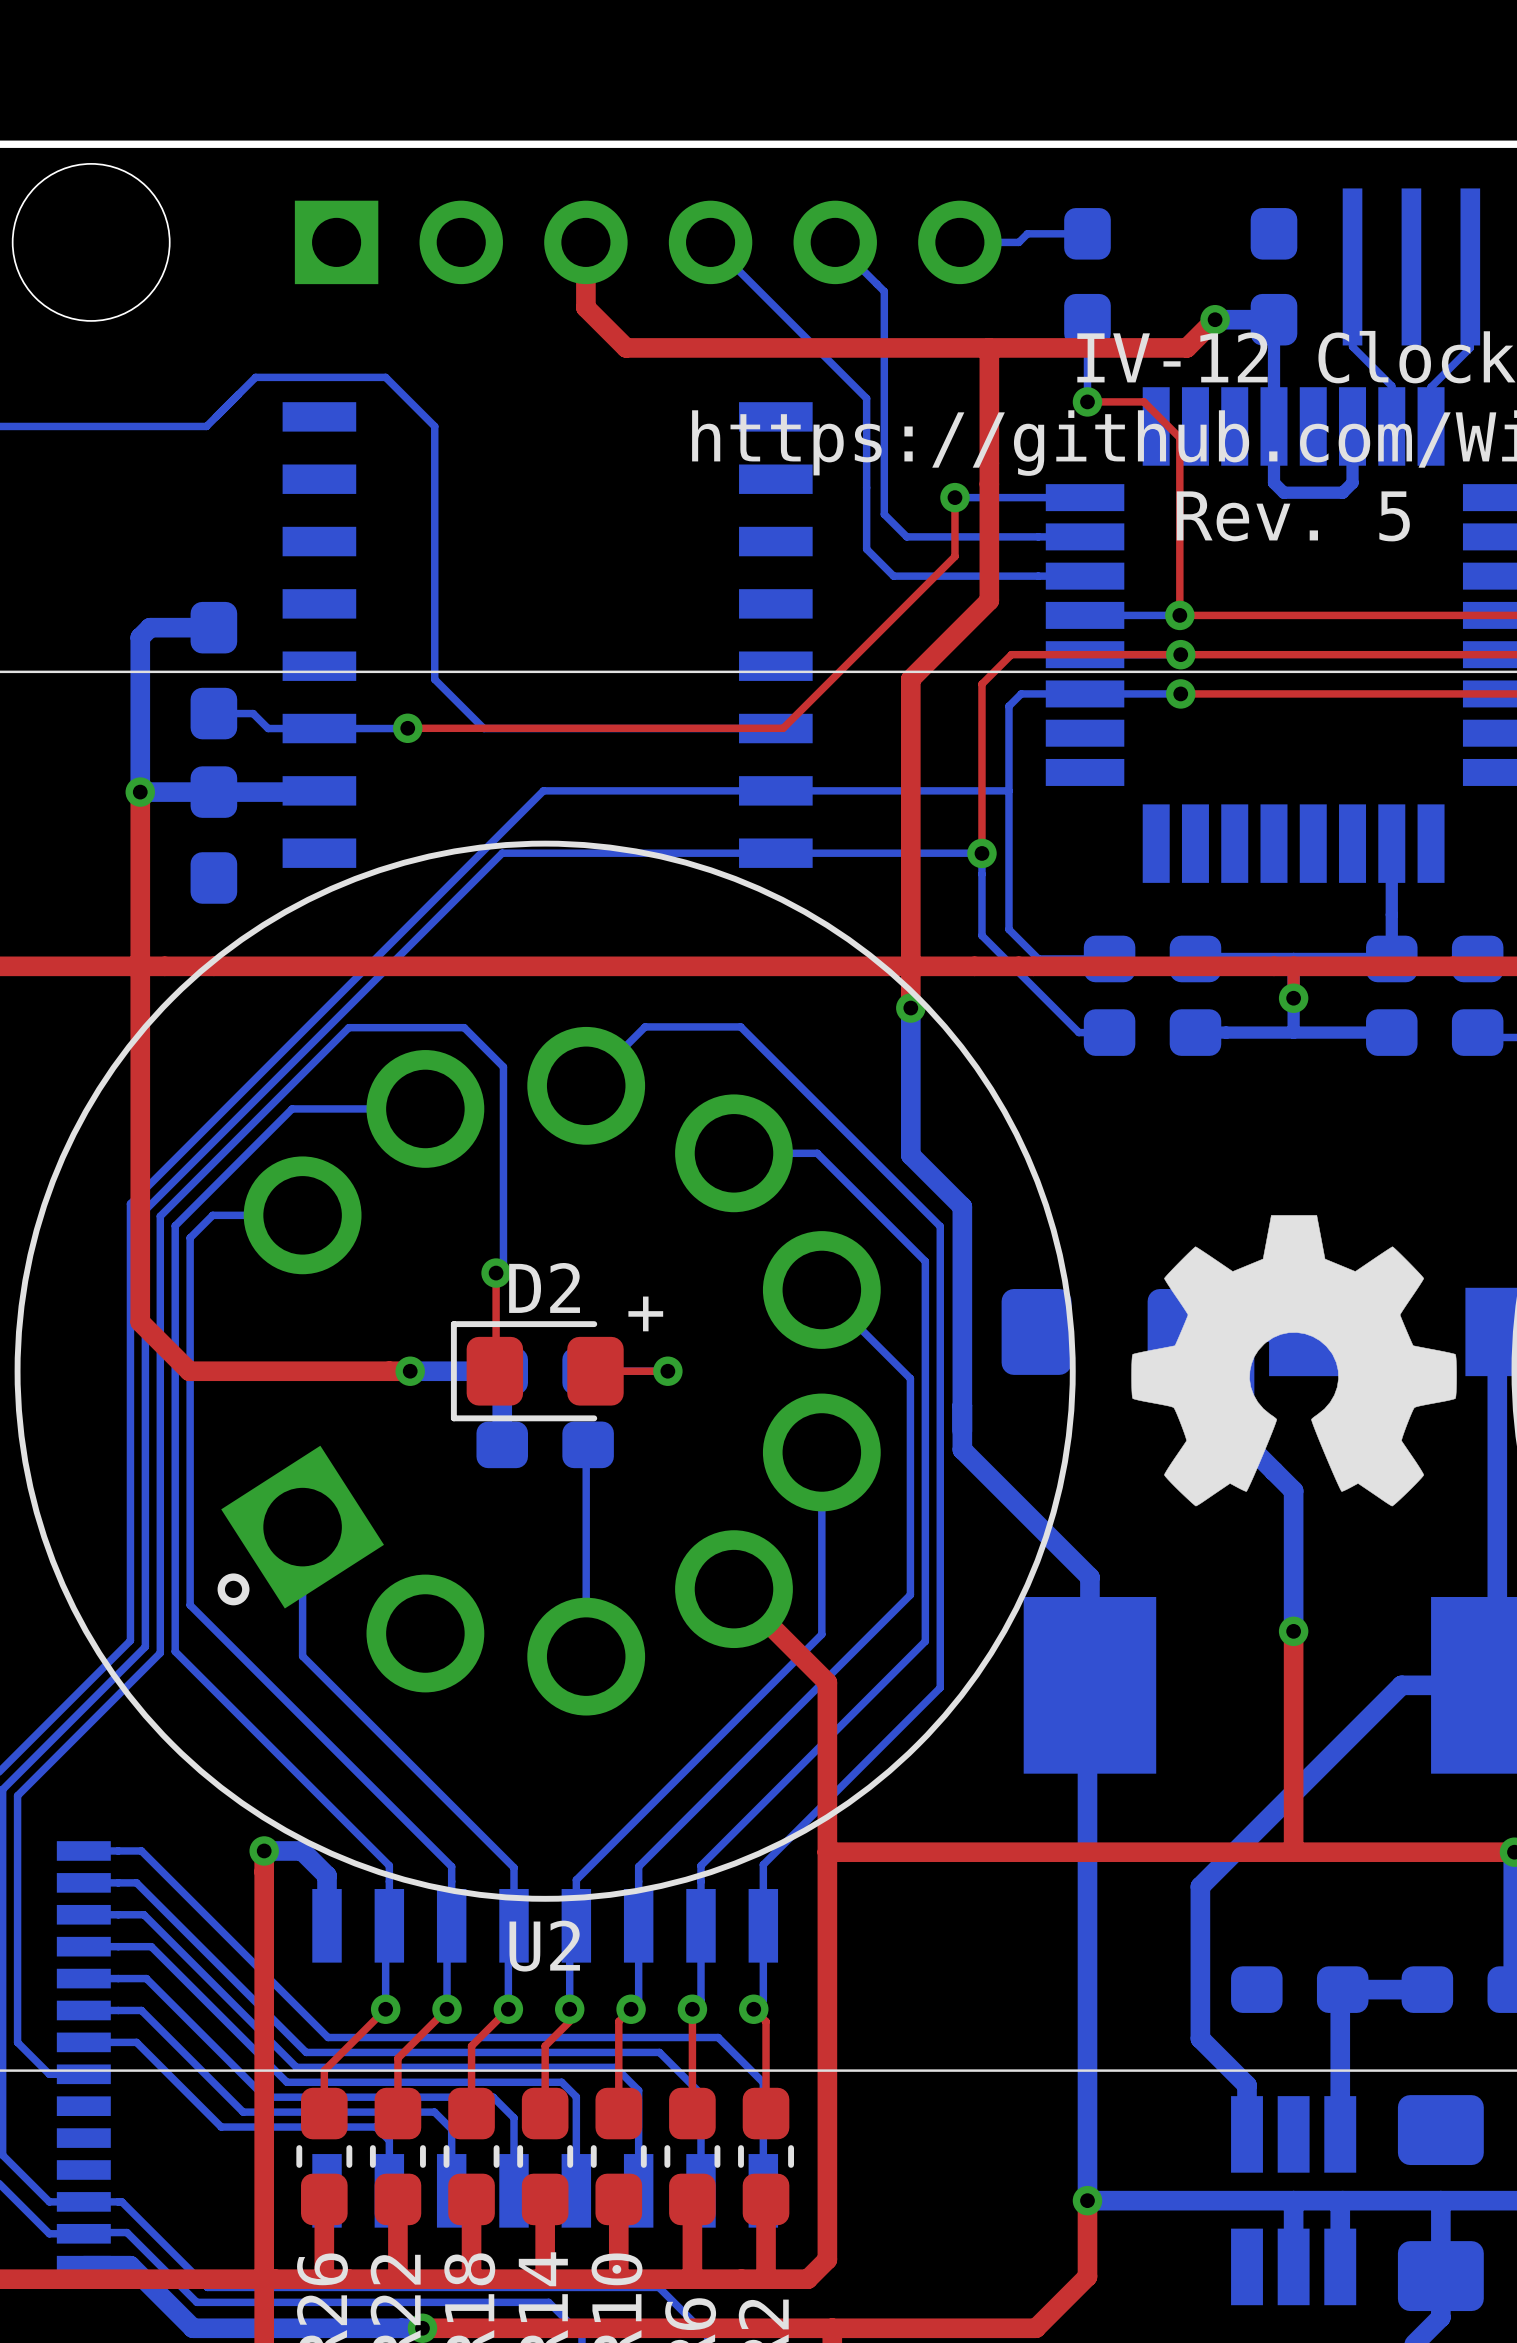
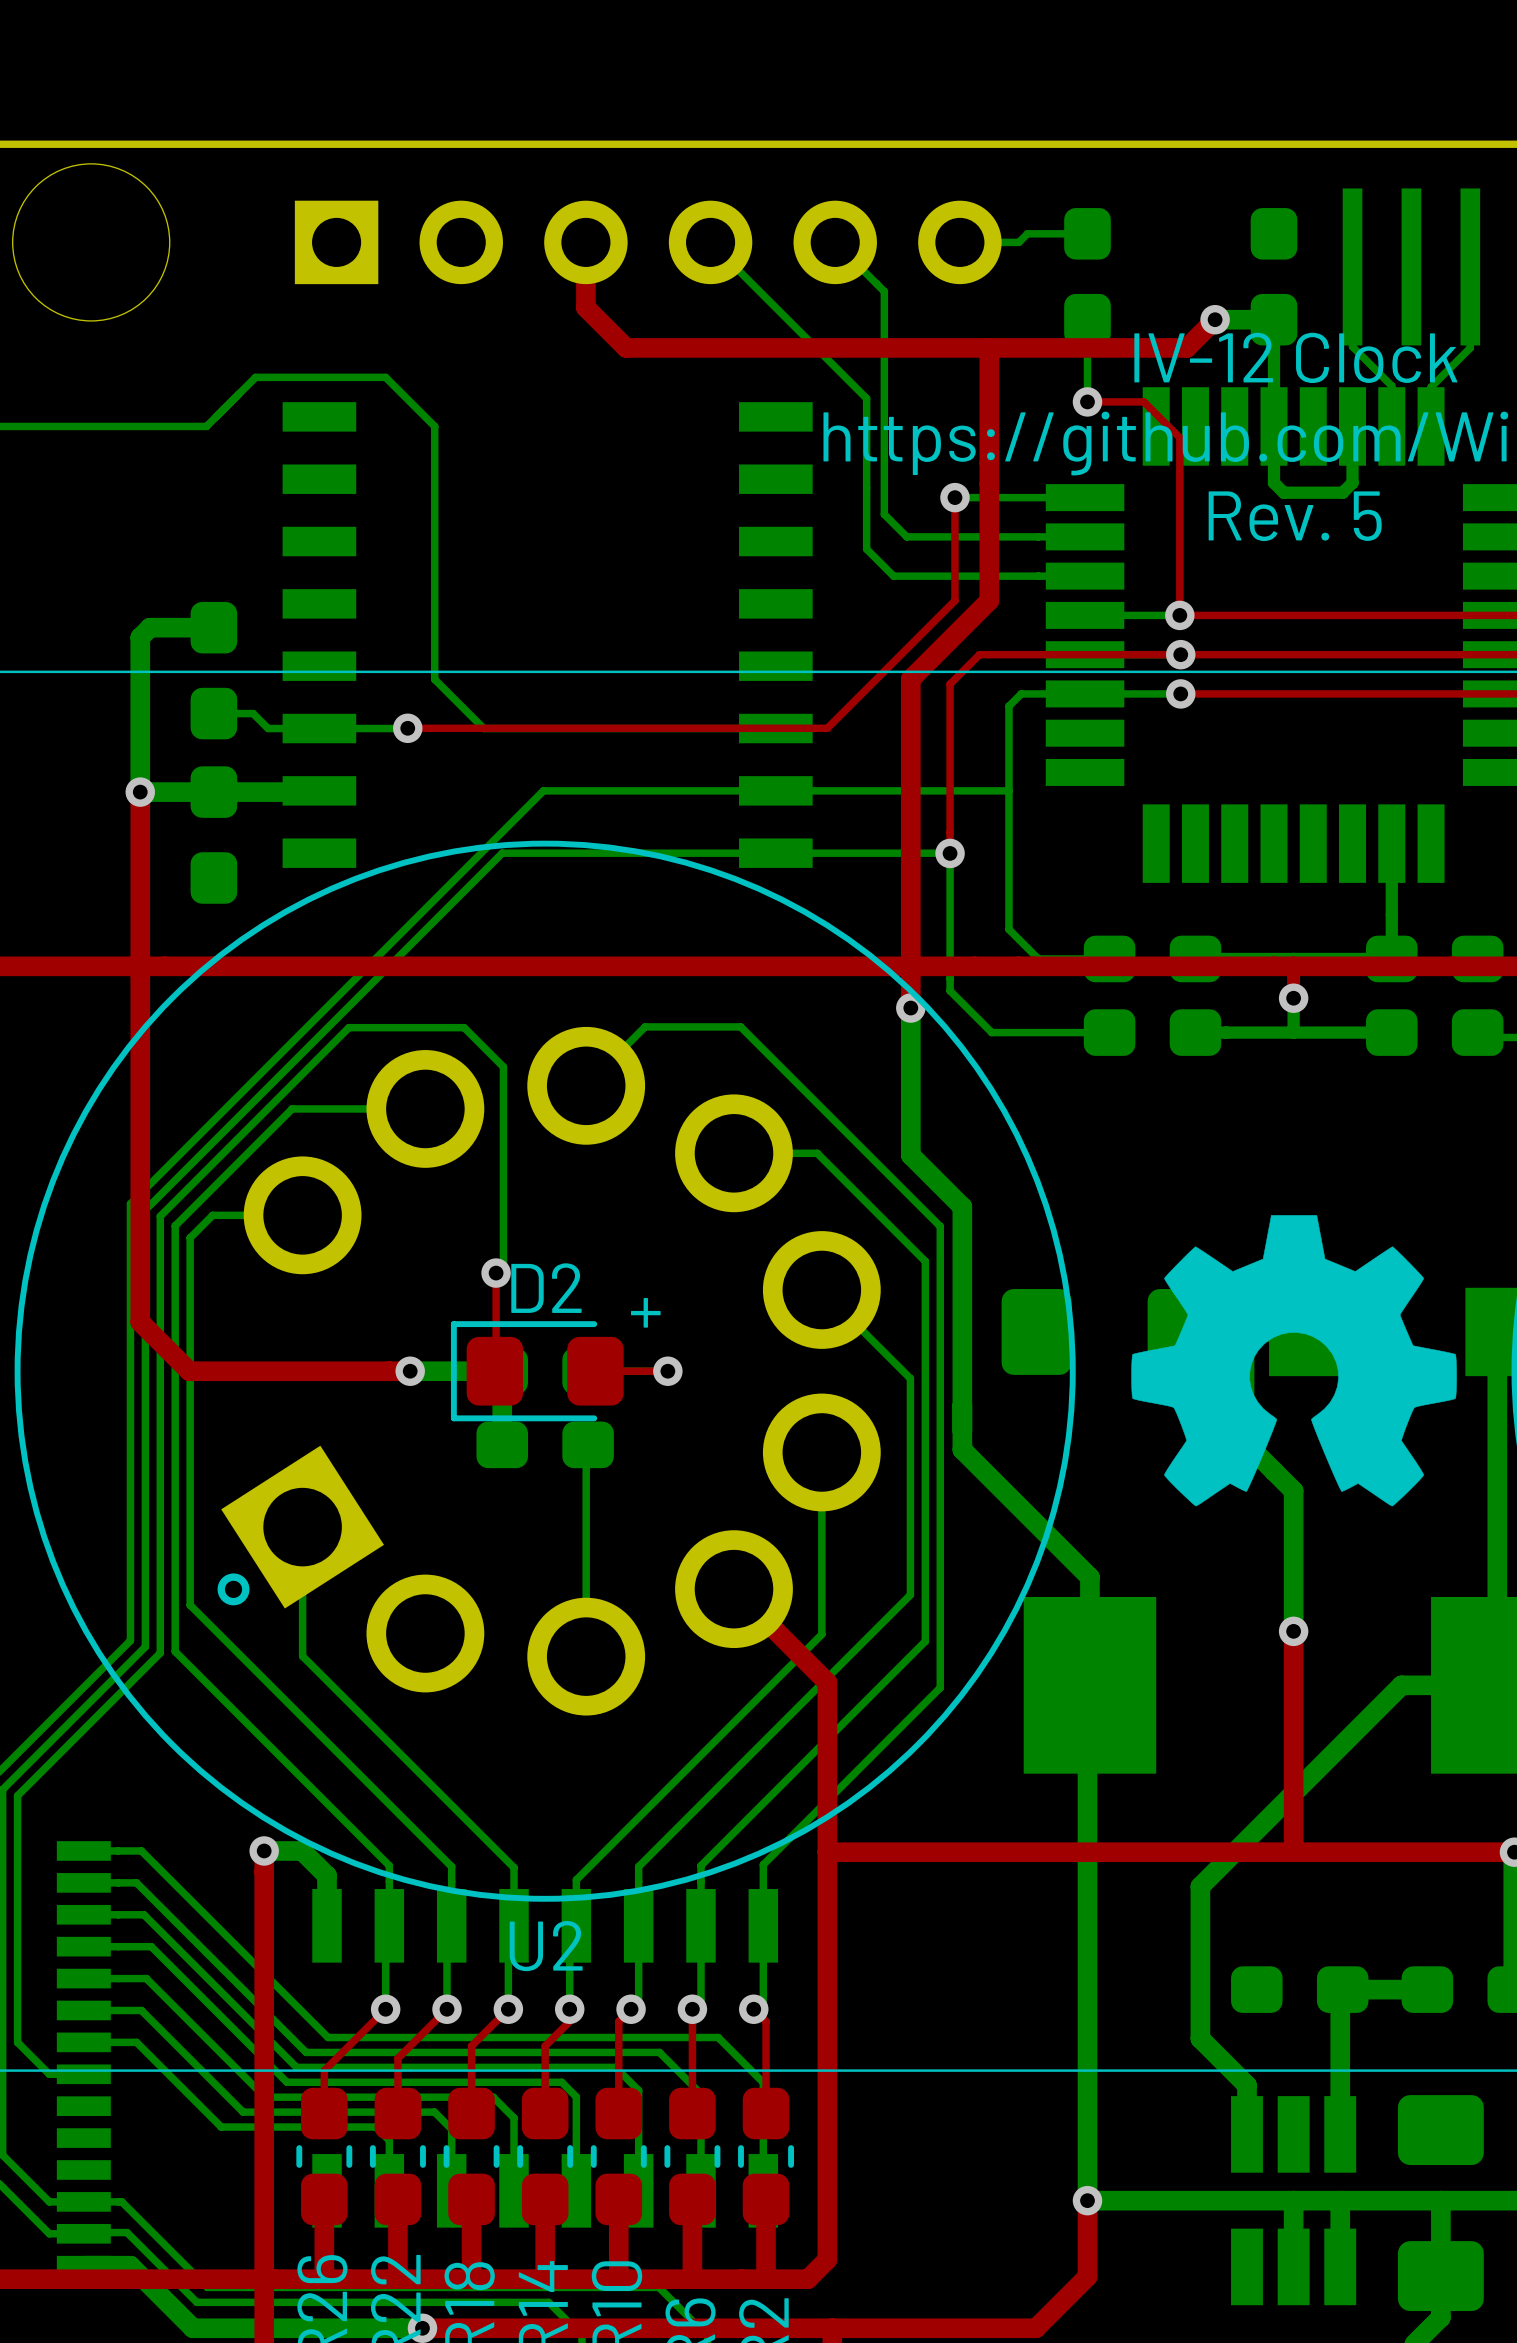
top track: (954, 556) (783, 728) -> (954, 556) (954, 600) (827, 728) (783, 728)
top track: (1011, 654) (981, 684) (981, 853) -> (1011, 654) (979, 654) (950, 684) (950, 853)
bottom track: (949, 853) (981, 853) -> none
bottom track: (981, 853) (981, 935) (1078, 1032) -> (950, 853) (950, 990) (991, 1032) (1078, 1032)
via position: (981, 853) -> (950, 853)

